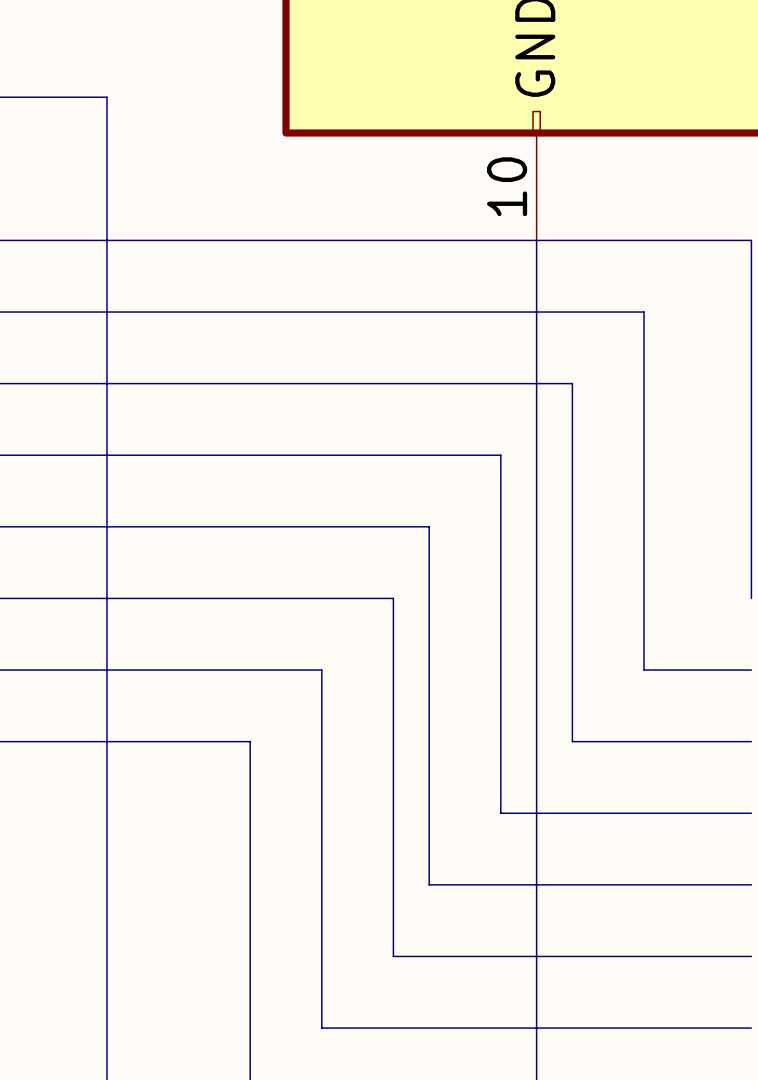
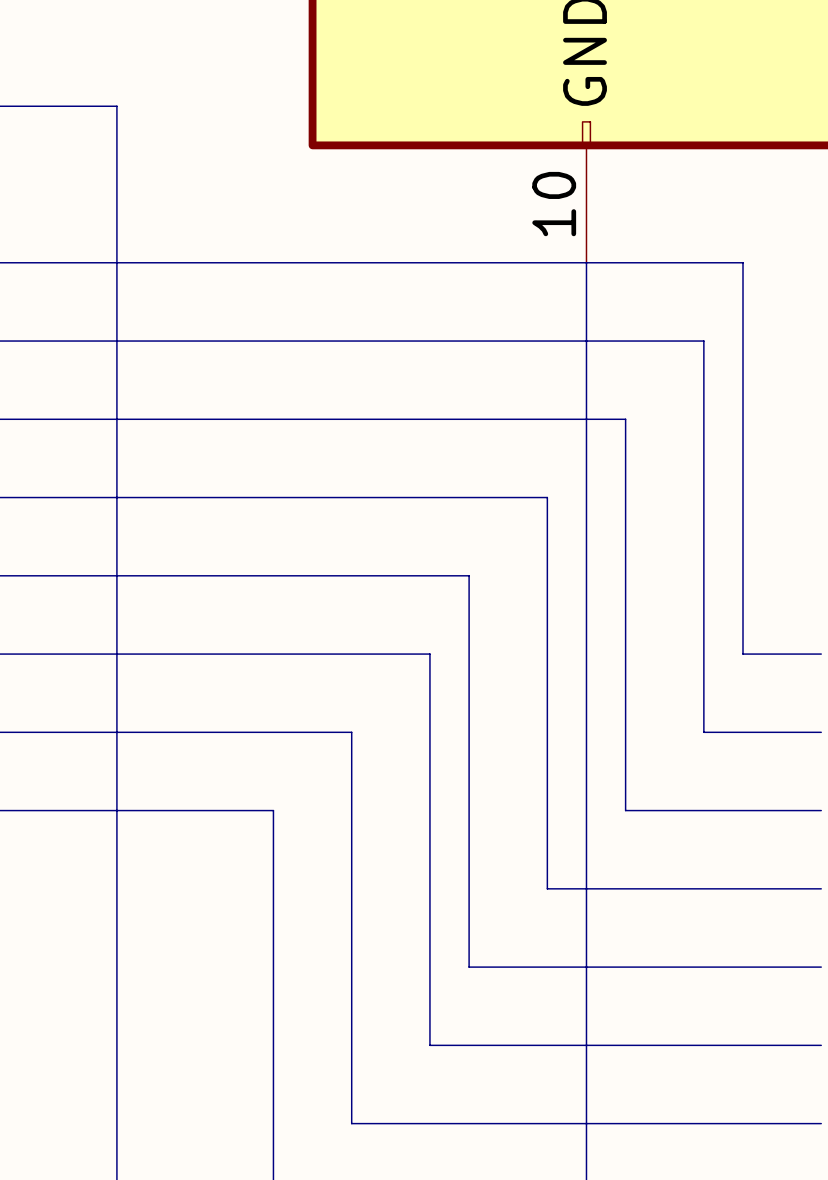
wire: (679, 240) (751, 240) (751, 598) -> (743, 262) (743, 654) (821, 654)

